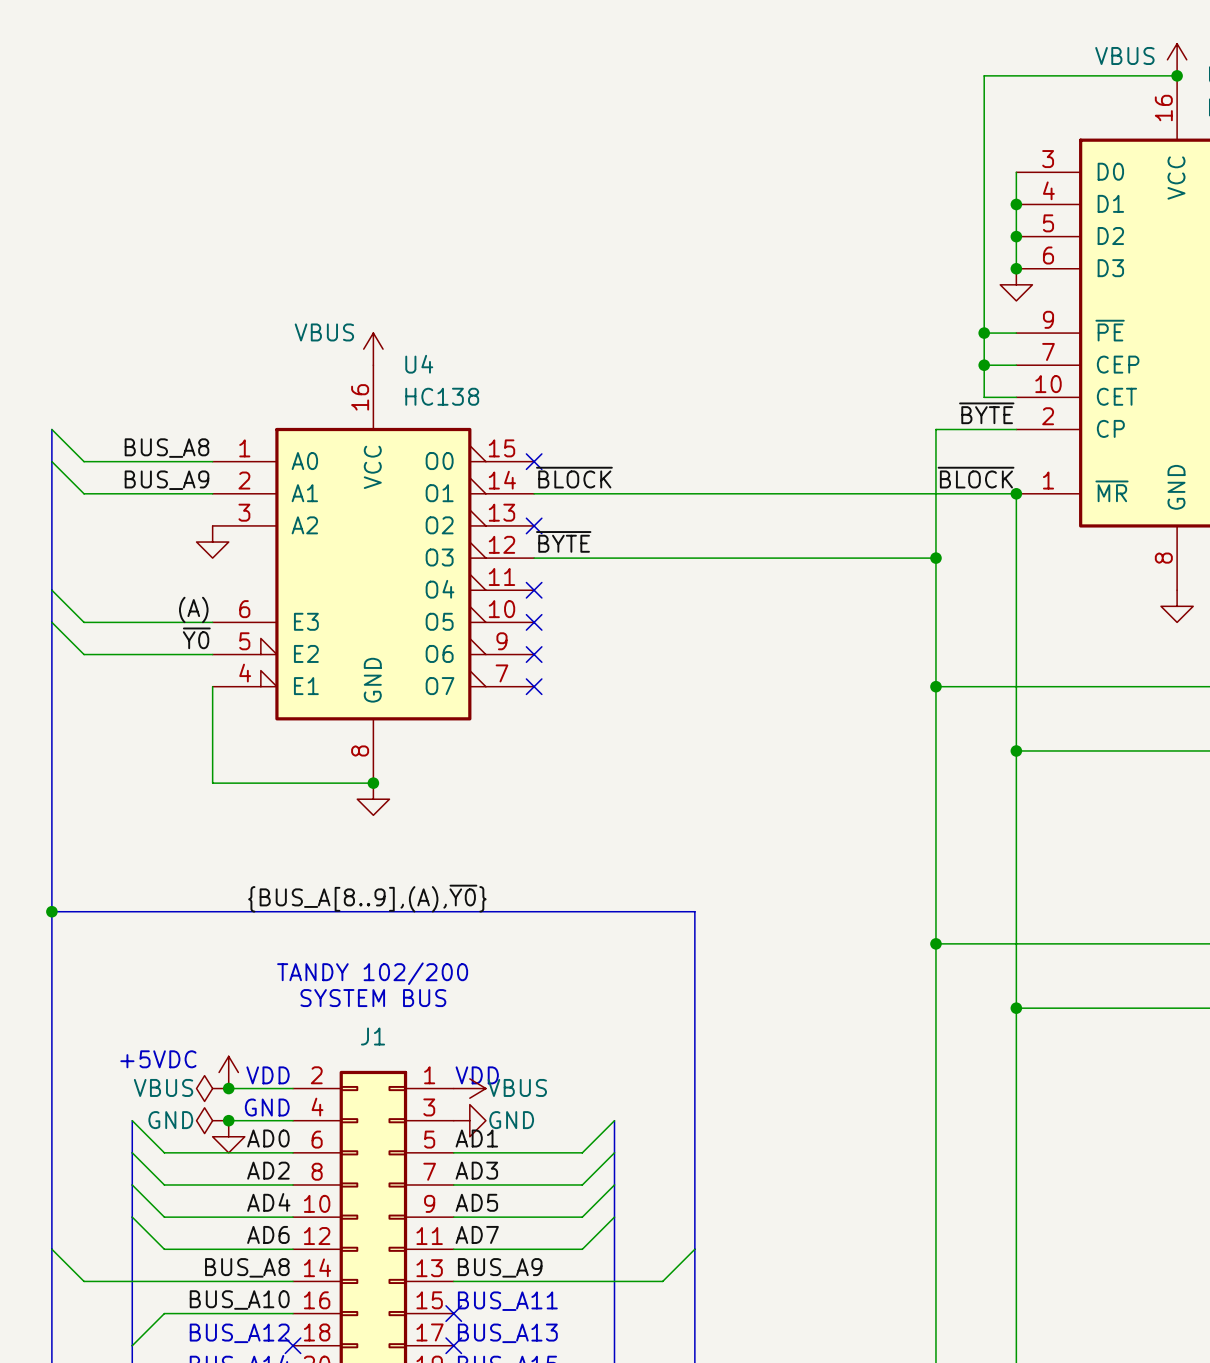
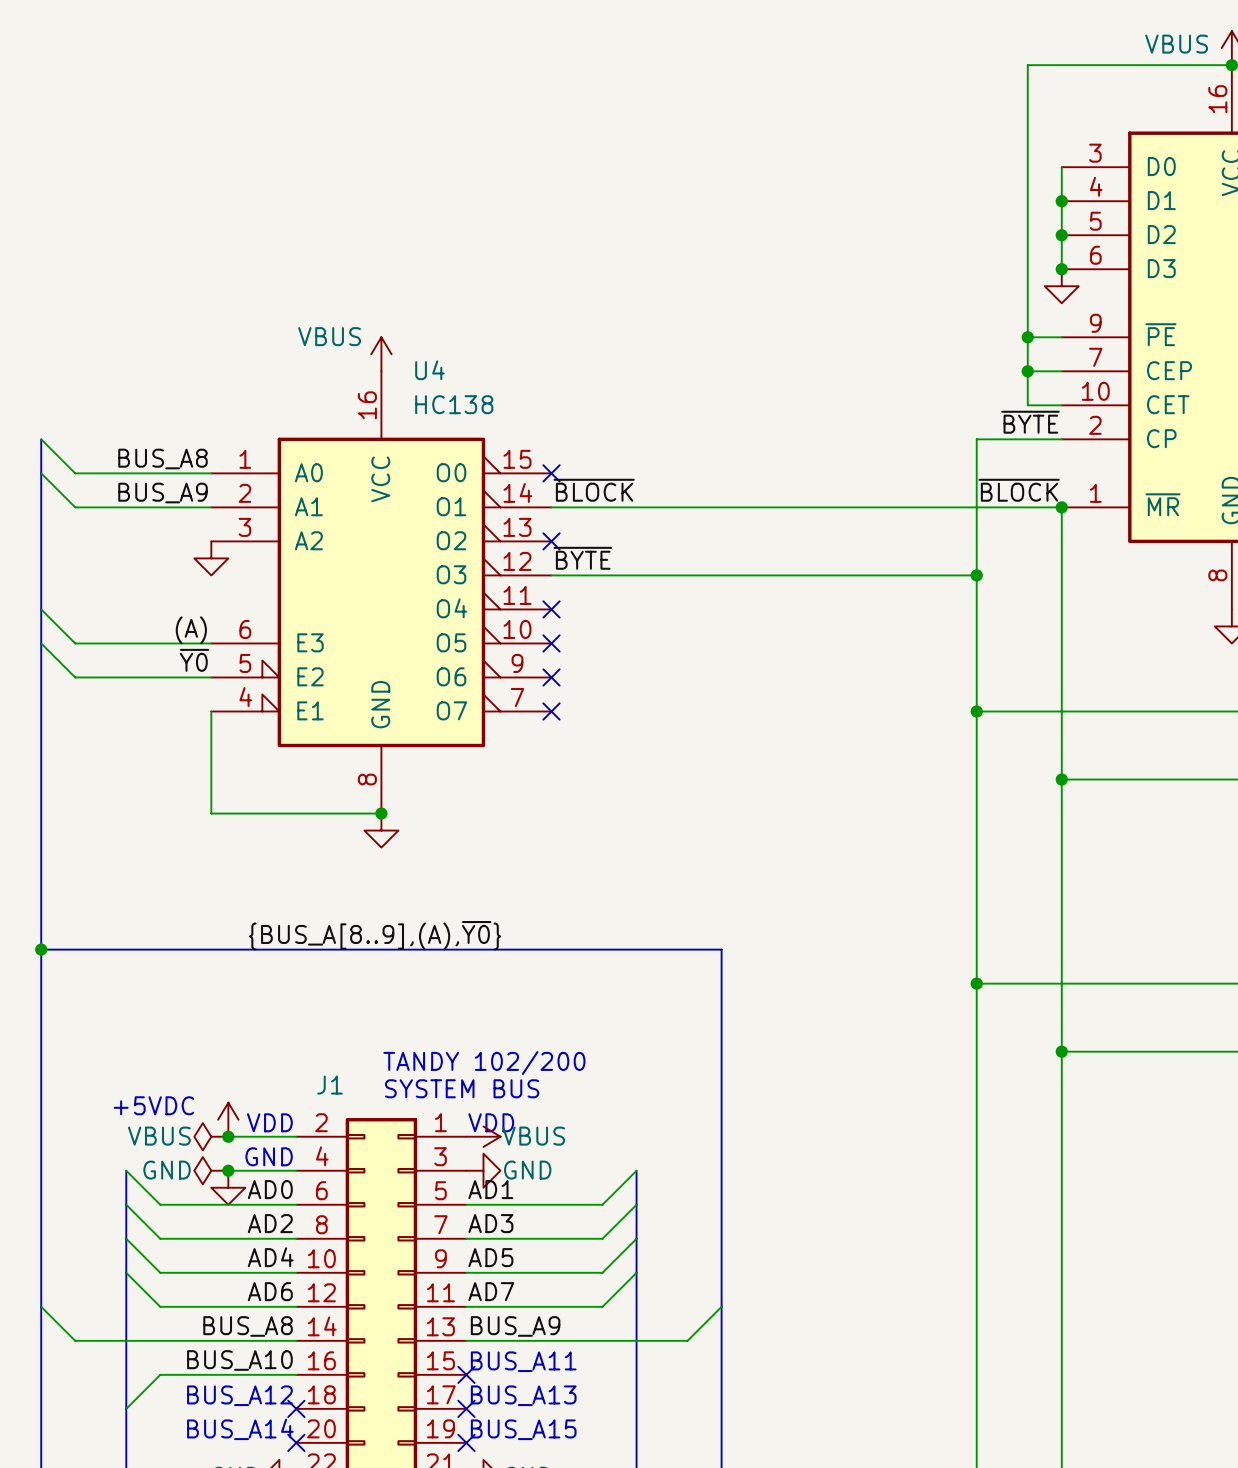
text position: TANDY 102/200 (372, 973) -> TANDY 102/200 (484, 1063)
text position: SYSTEM BUS (373, 998) -> SYSTEM BUS (462, 1088)
J1 name position: J1 (373, 1036) -> J1 (329, 1085)

